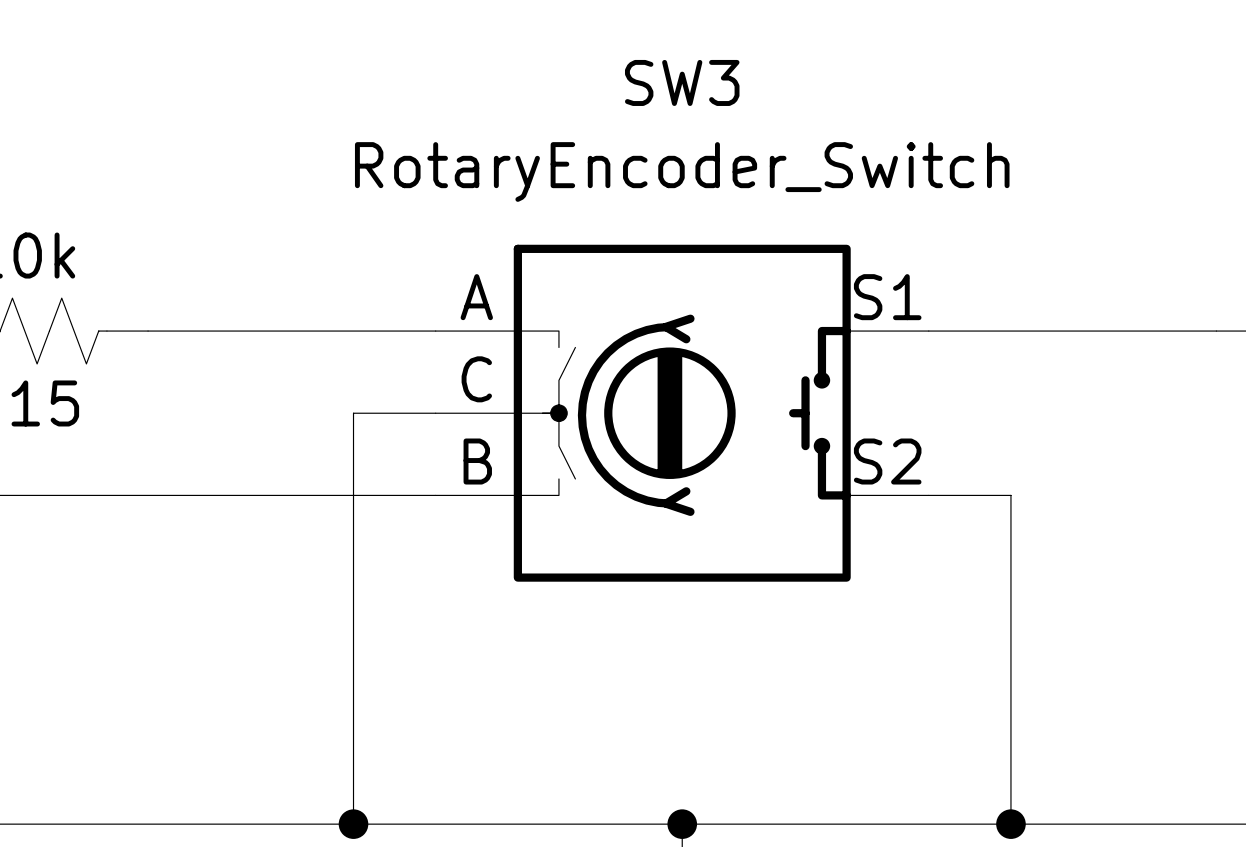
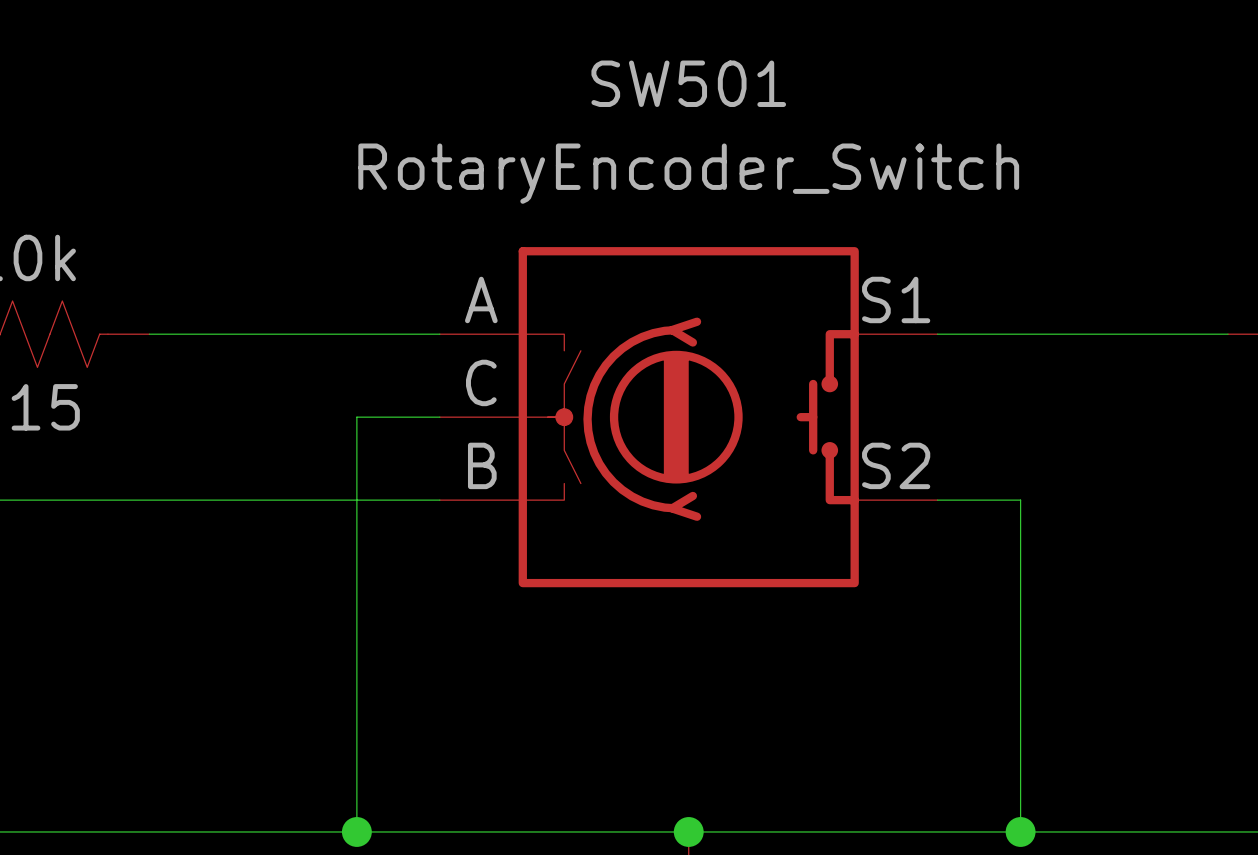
SW3 name: SW3 (682, 82) -> SW501 (688, 83)

